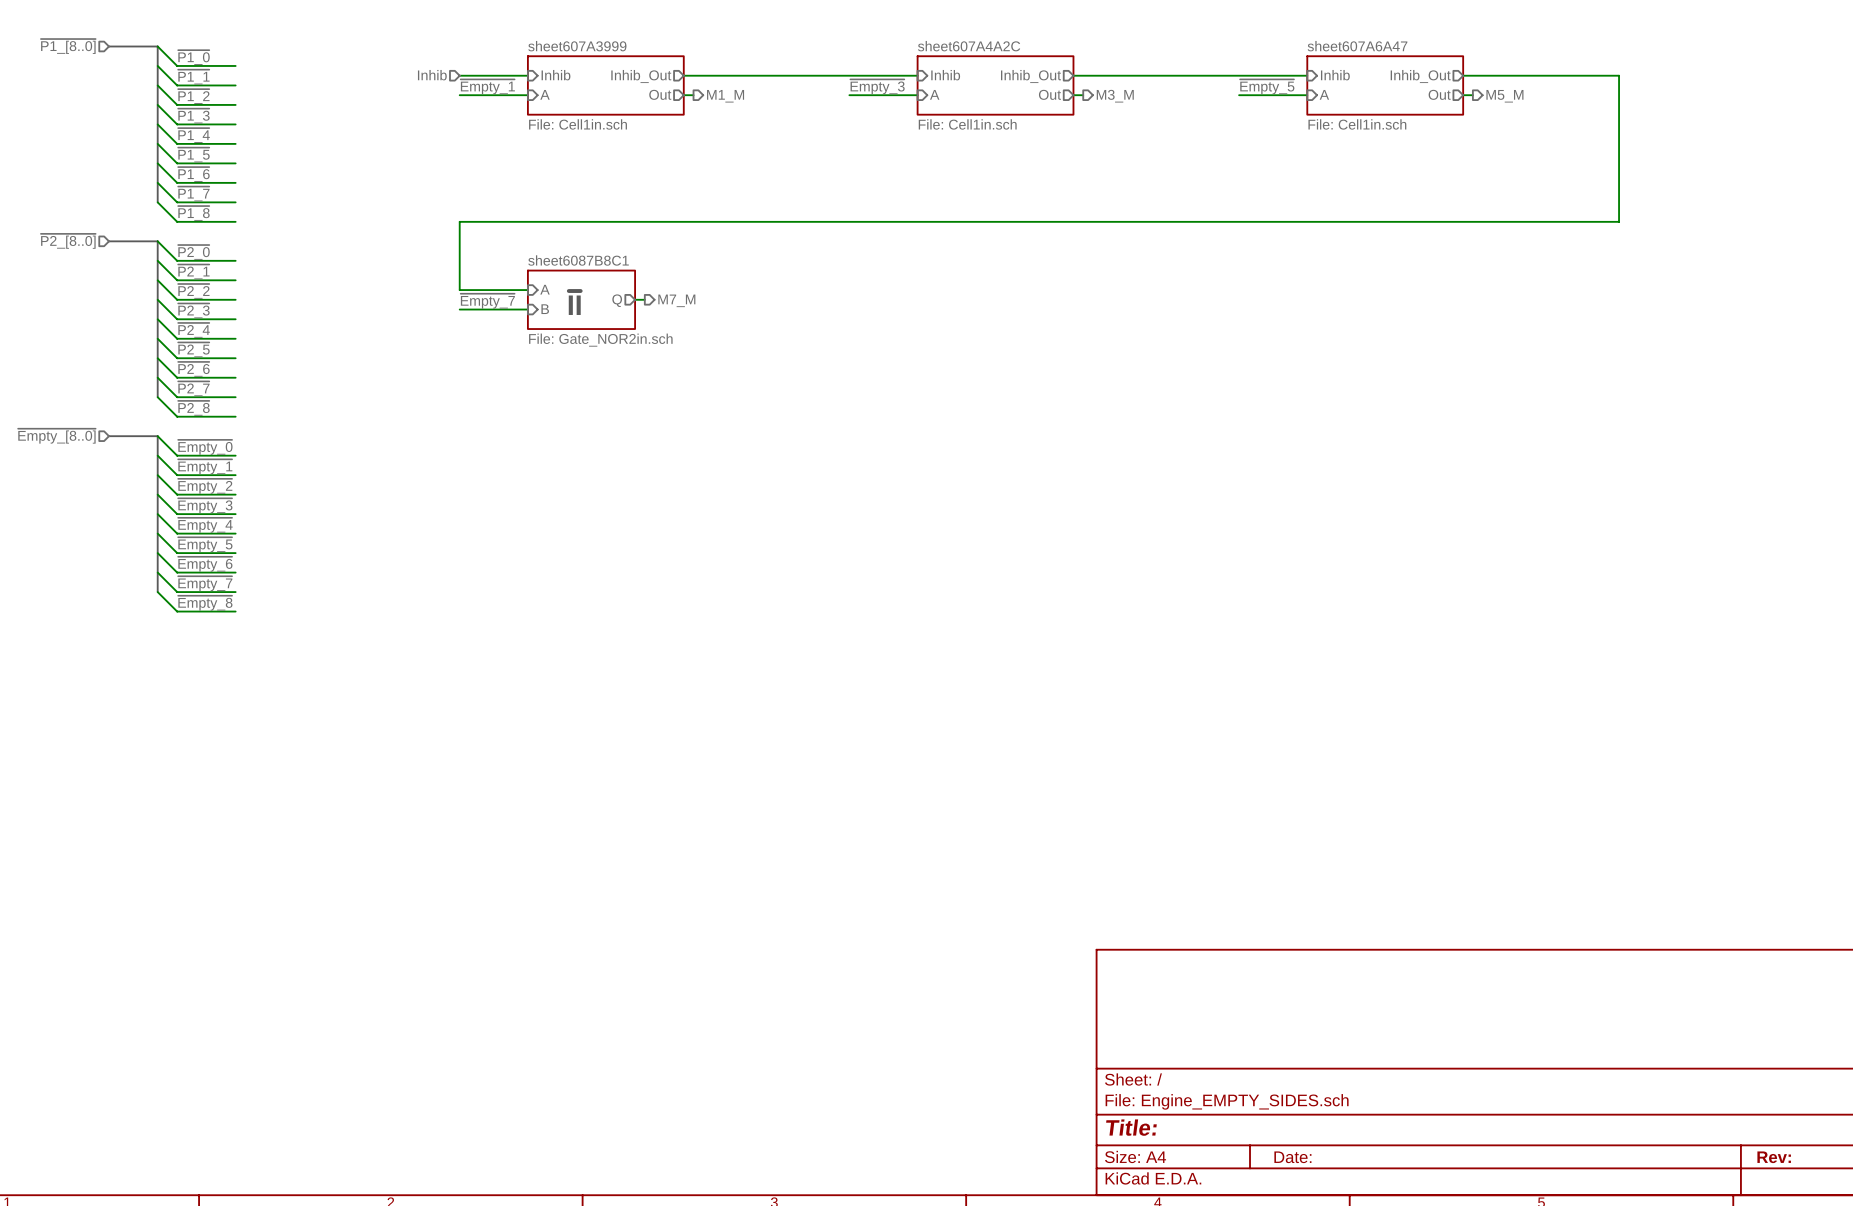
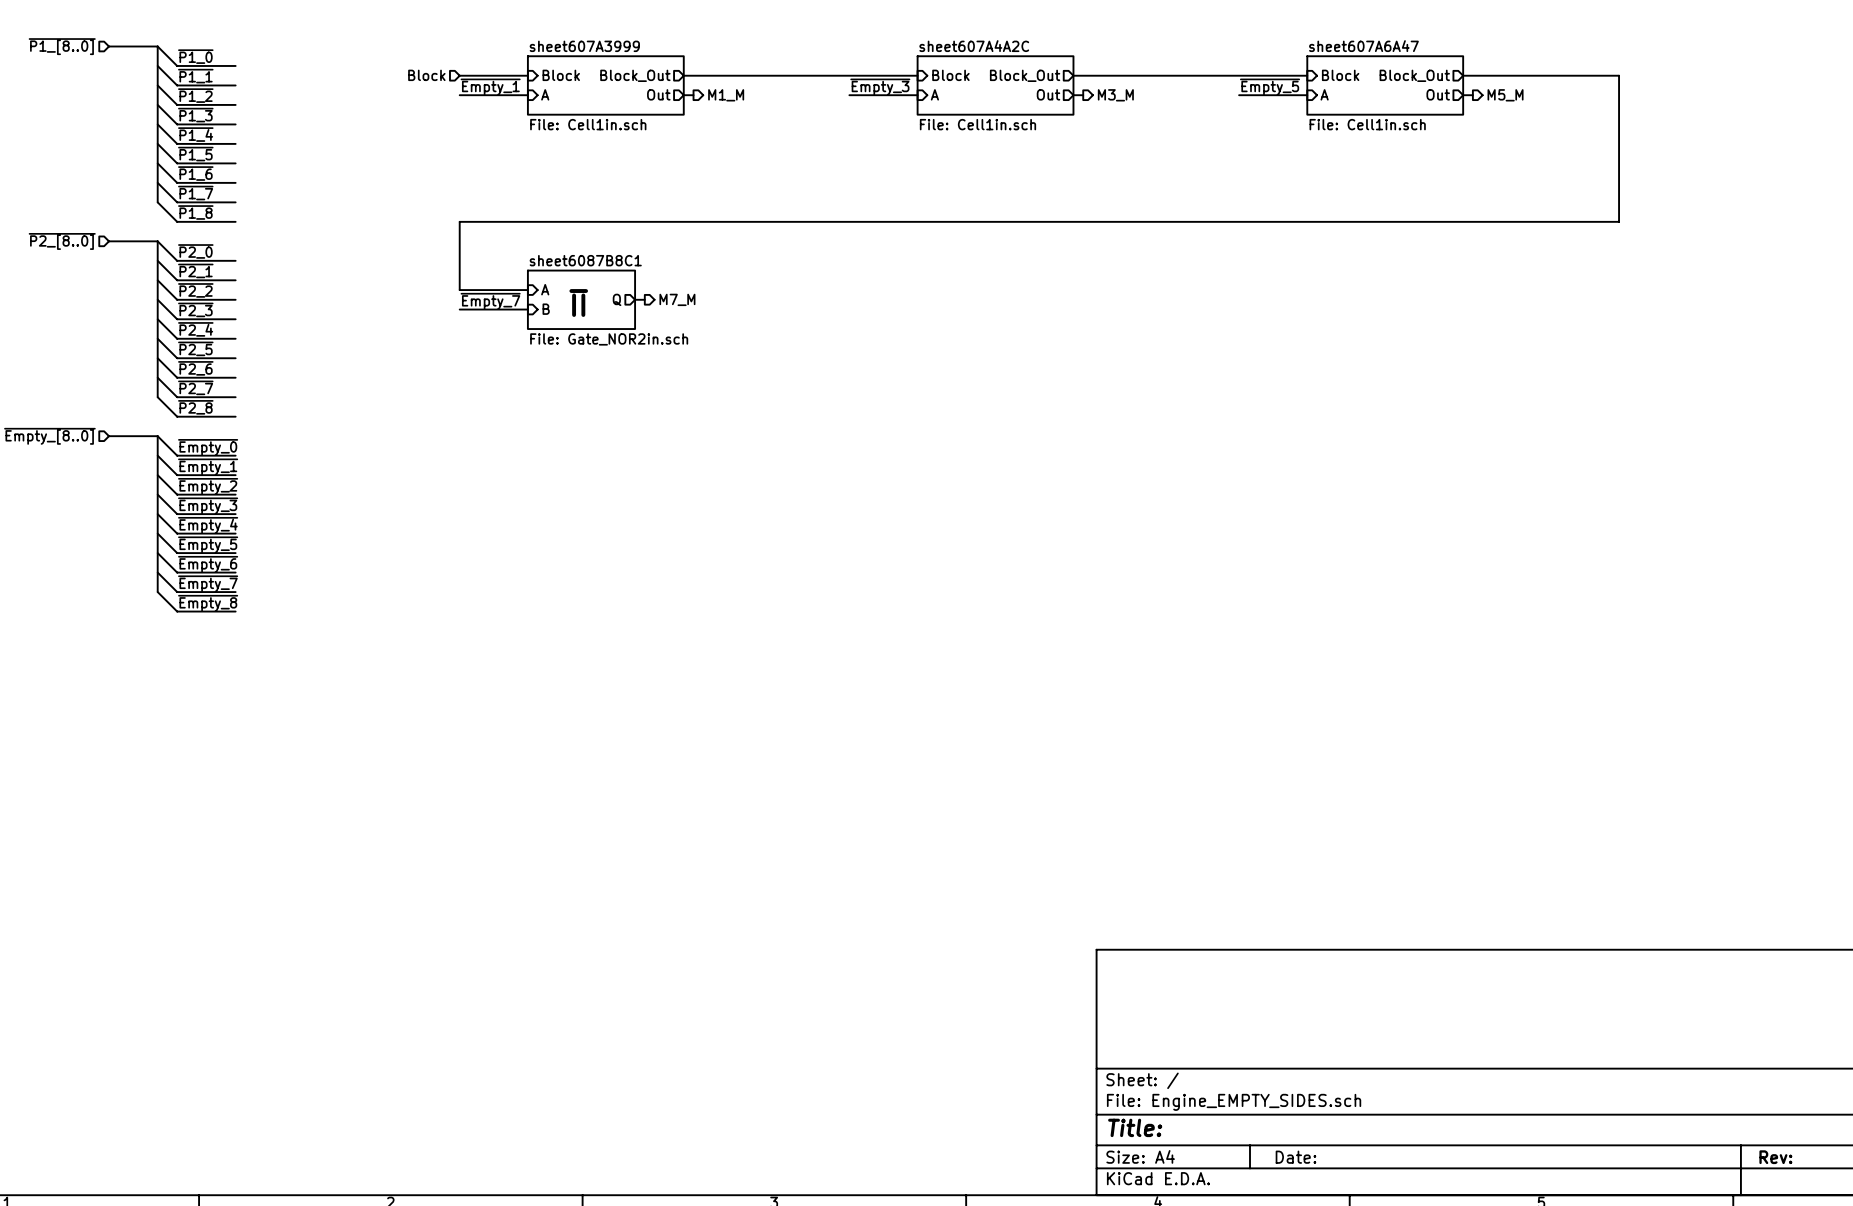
hierarchical label: Inhib (432, 75) -> Block (426, 75)
sheet pin: Inhib (555, 75) -> Block (561, 75)
sheet pin: Inhib (945, 75) -> Block (950, 75)
sheet pin: Inhib (1335, 75) -> Block (1340, 75)
sheet pin: Inhib_Out (641, 76) -> Block_Out (635, 75)
sheet pin: Inhib_Out (1031, 76) -> Block_Out (1025, 75)
sheet pin: Inhib_Out (1420, 76) -> Block_Out (1414, 75)

